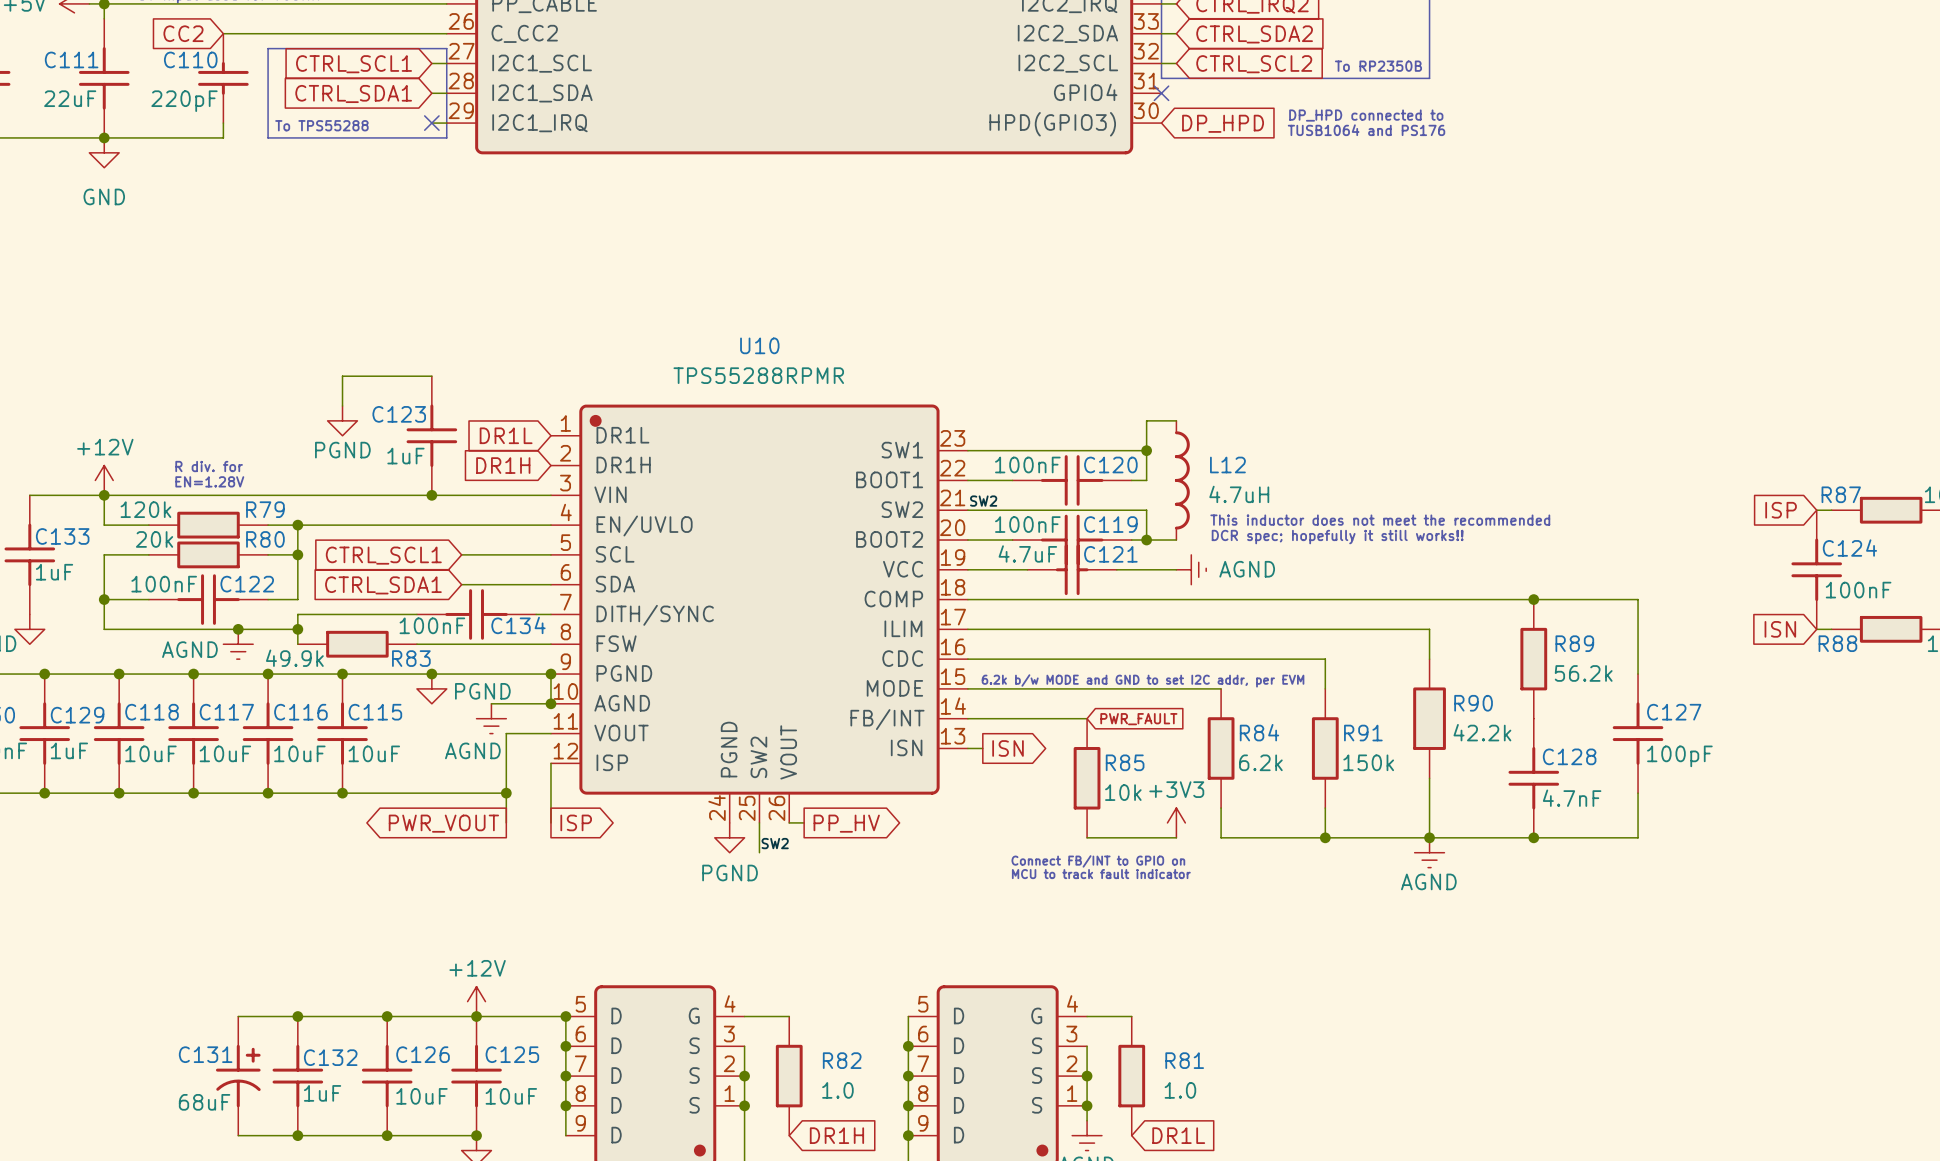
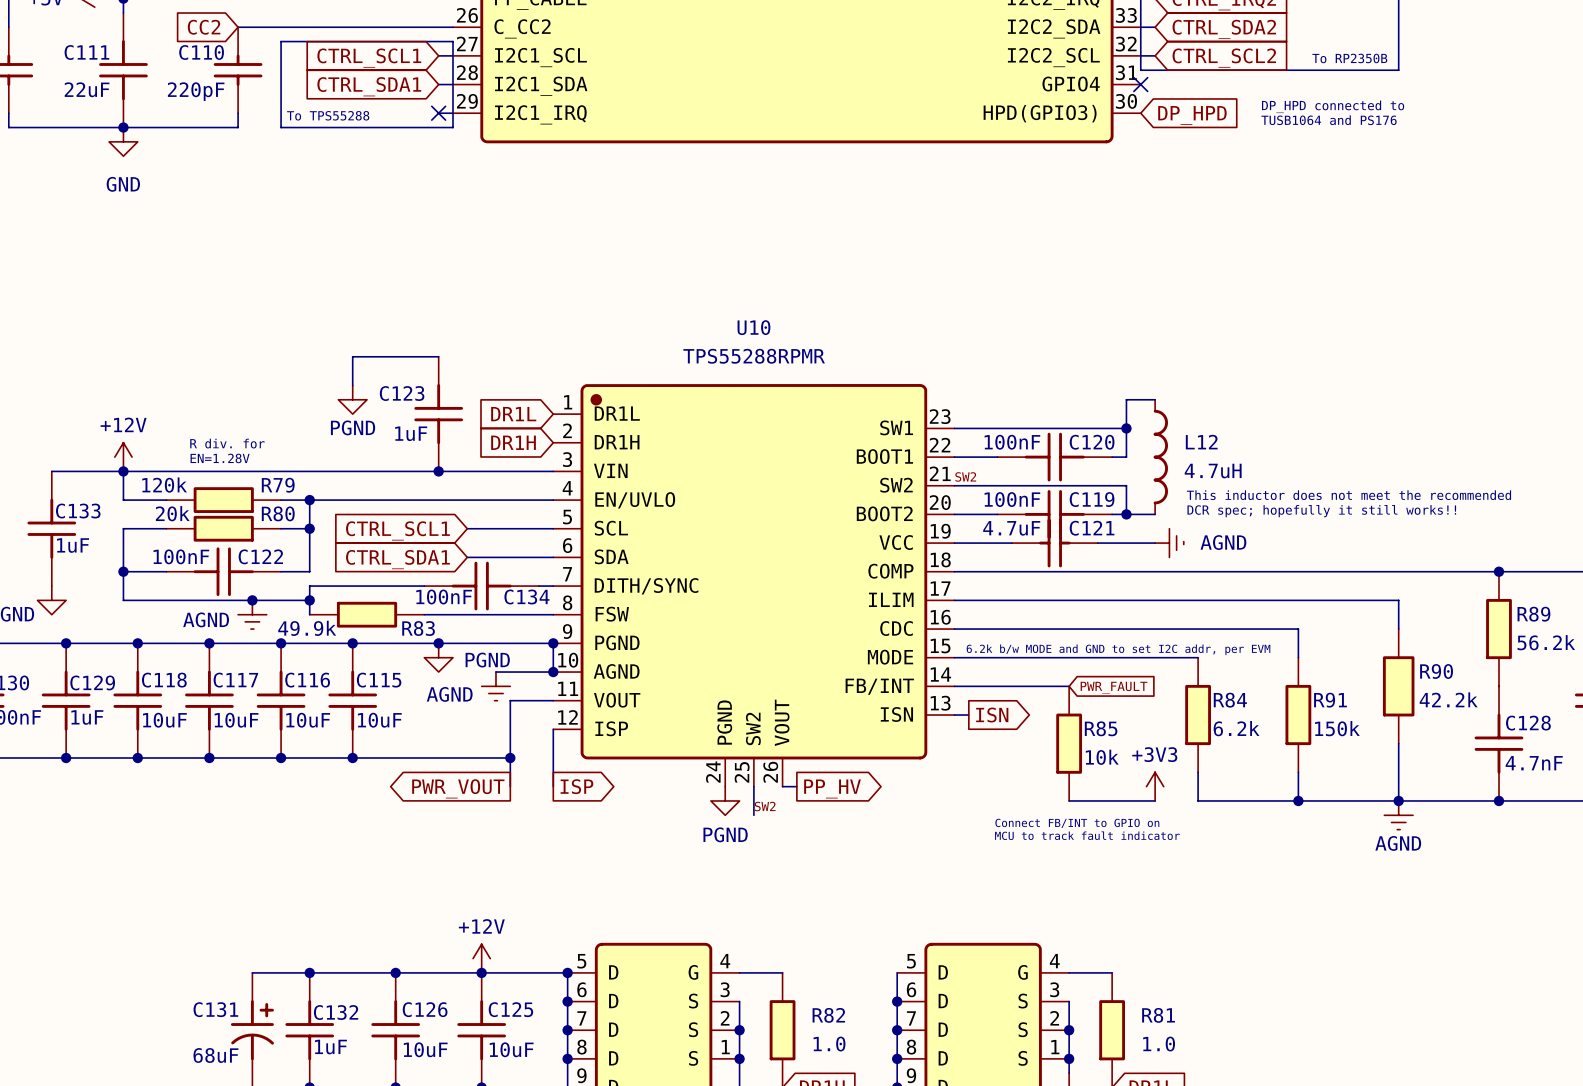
power symbol text position: AGND (472, 750) -> AGND (449, 694)

